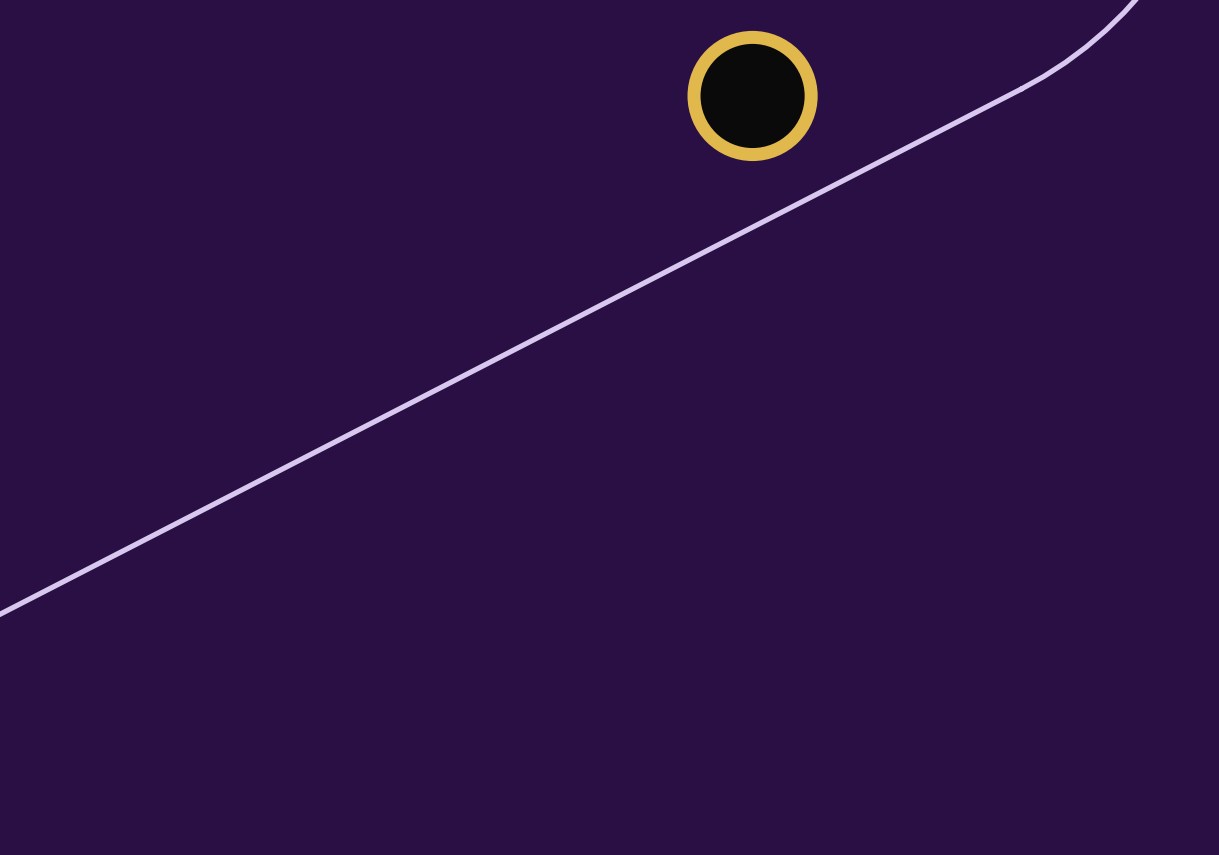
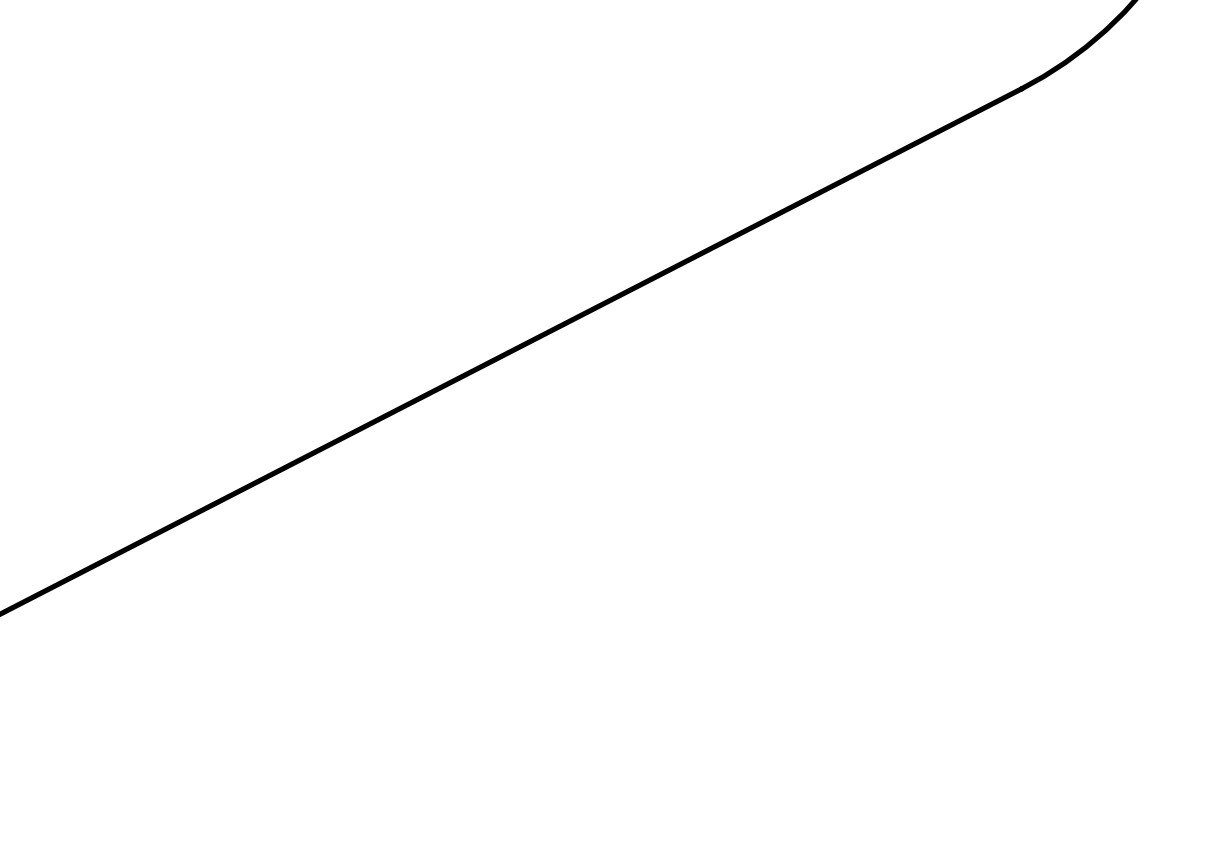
part: (752, 95) -> none

